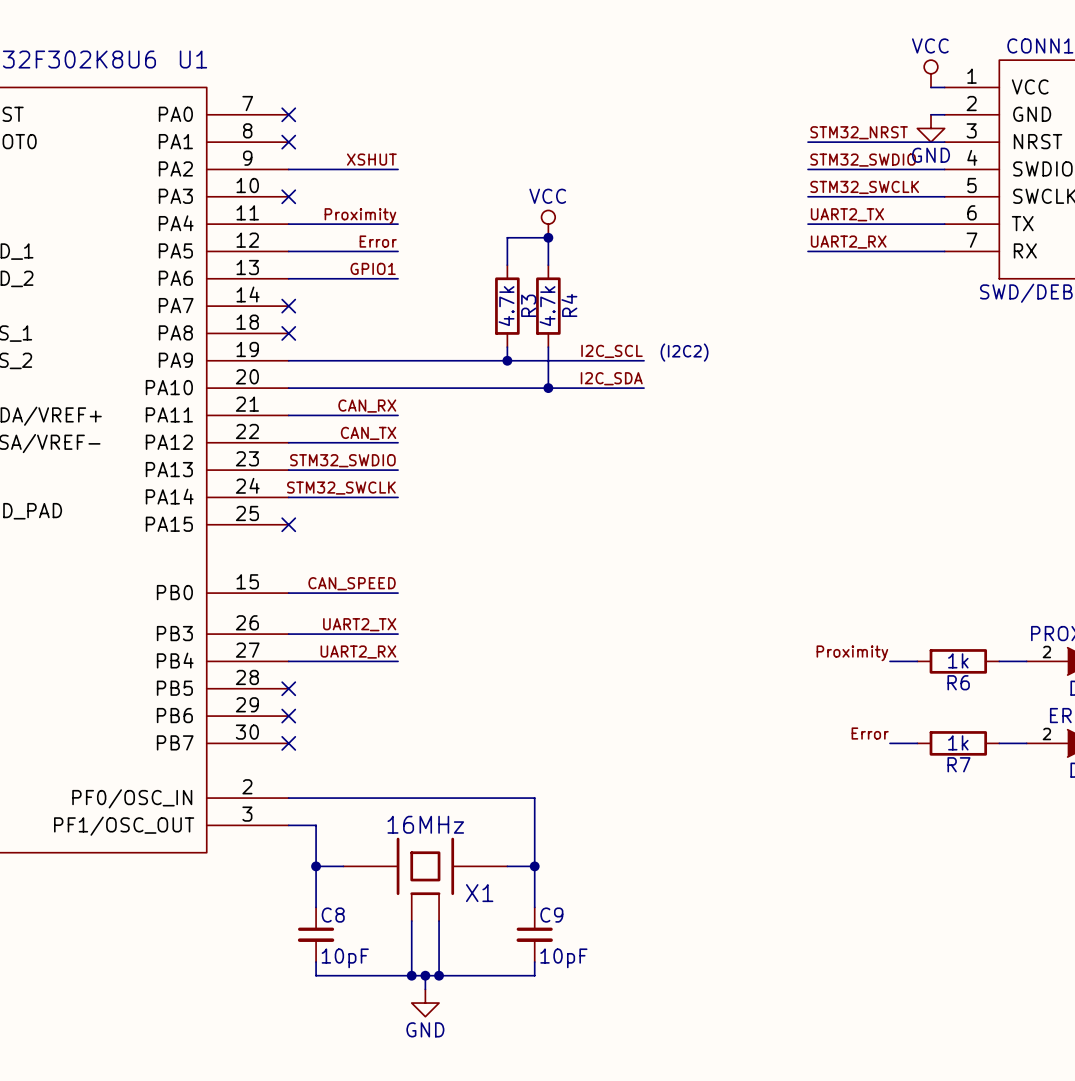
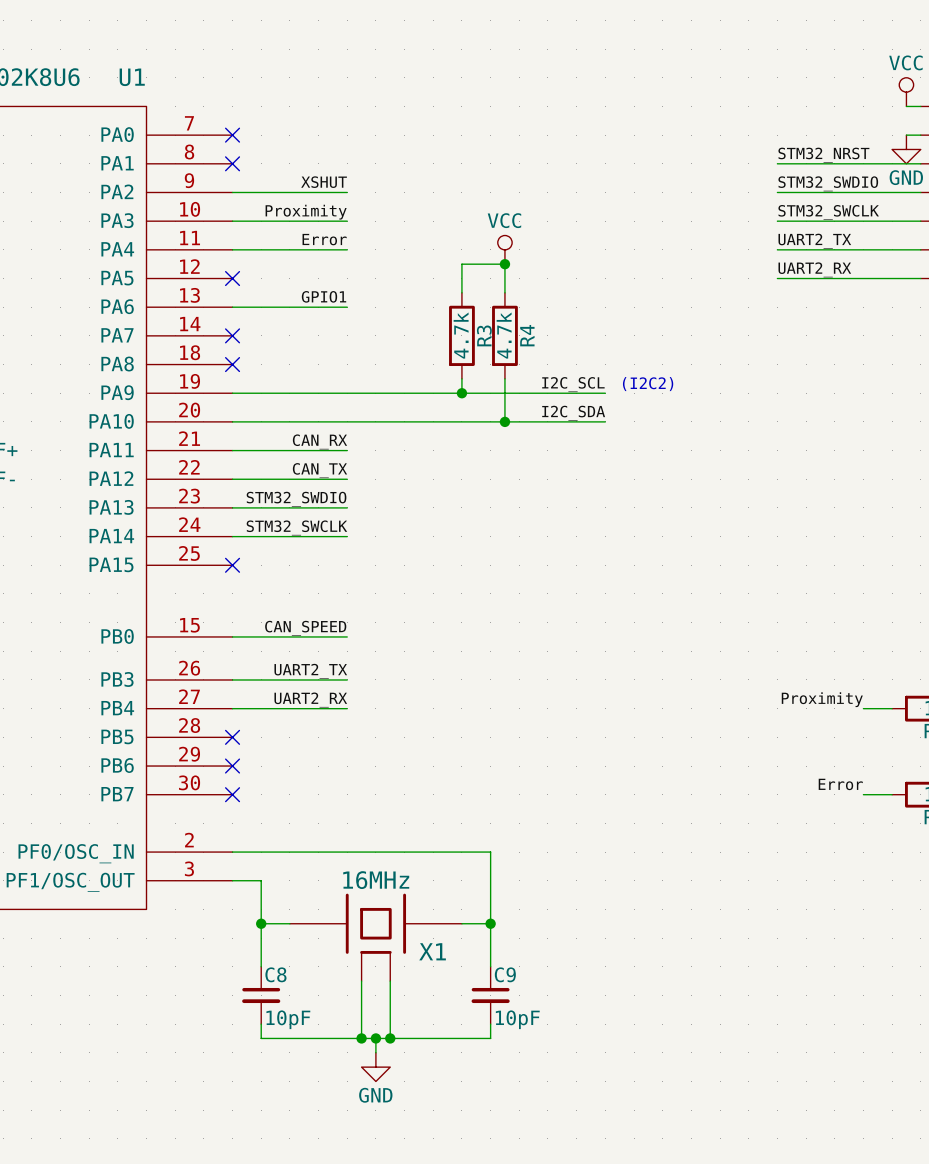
label: none -> Proximity (306, 212)
no-connect mark position: (288, 196) -> (232, 278)
label: Proximity (360, 216) -> Error (324, 239)
label: Error (378, 241) -> none
wire: (288, 251) (398, 251) -> (232, 221) (347, 221)

